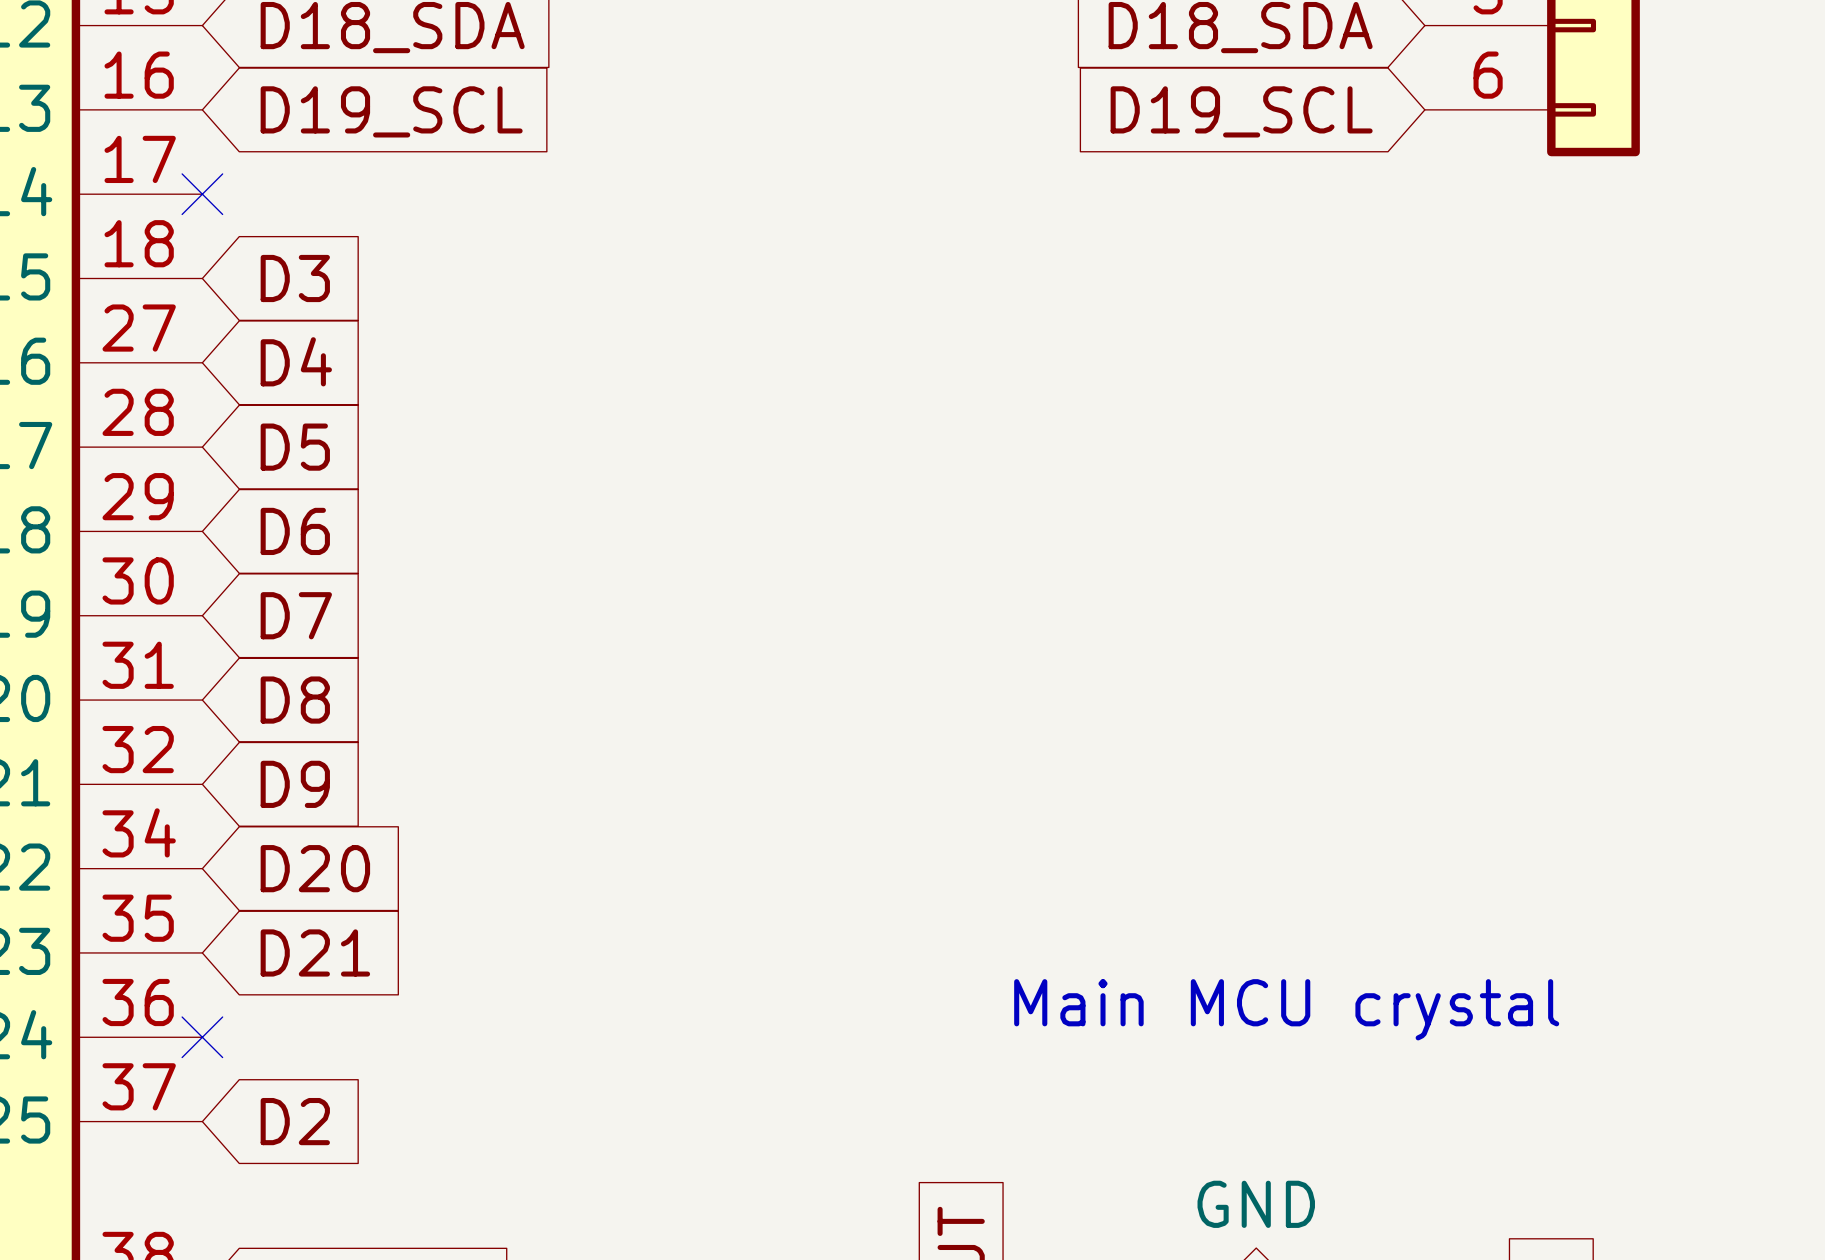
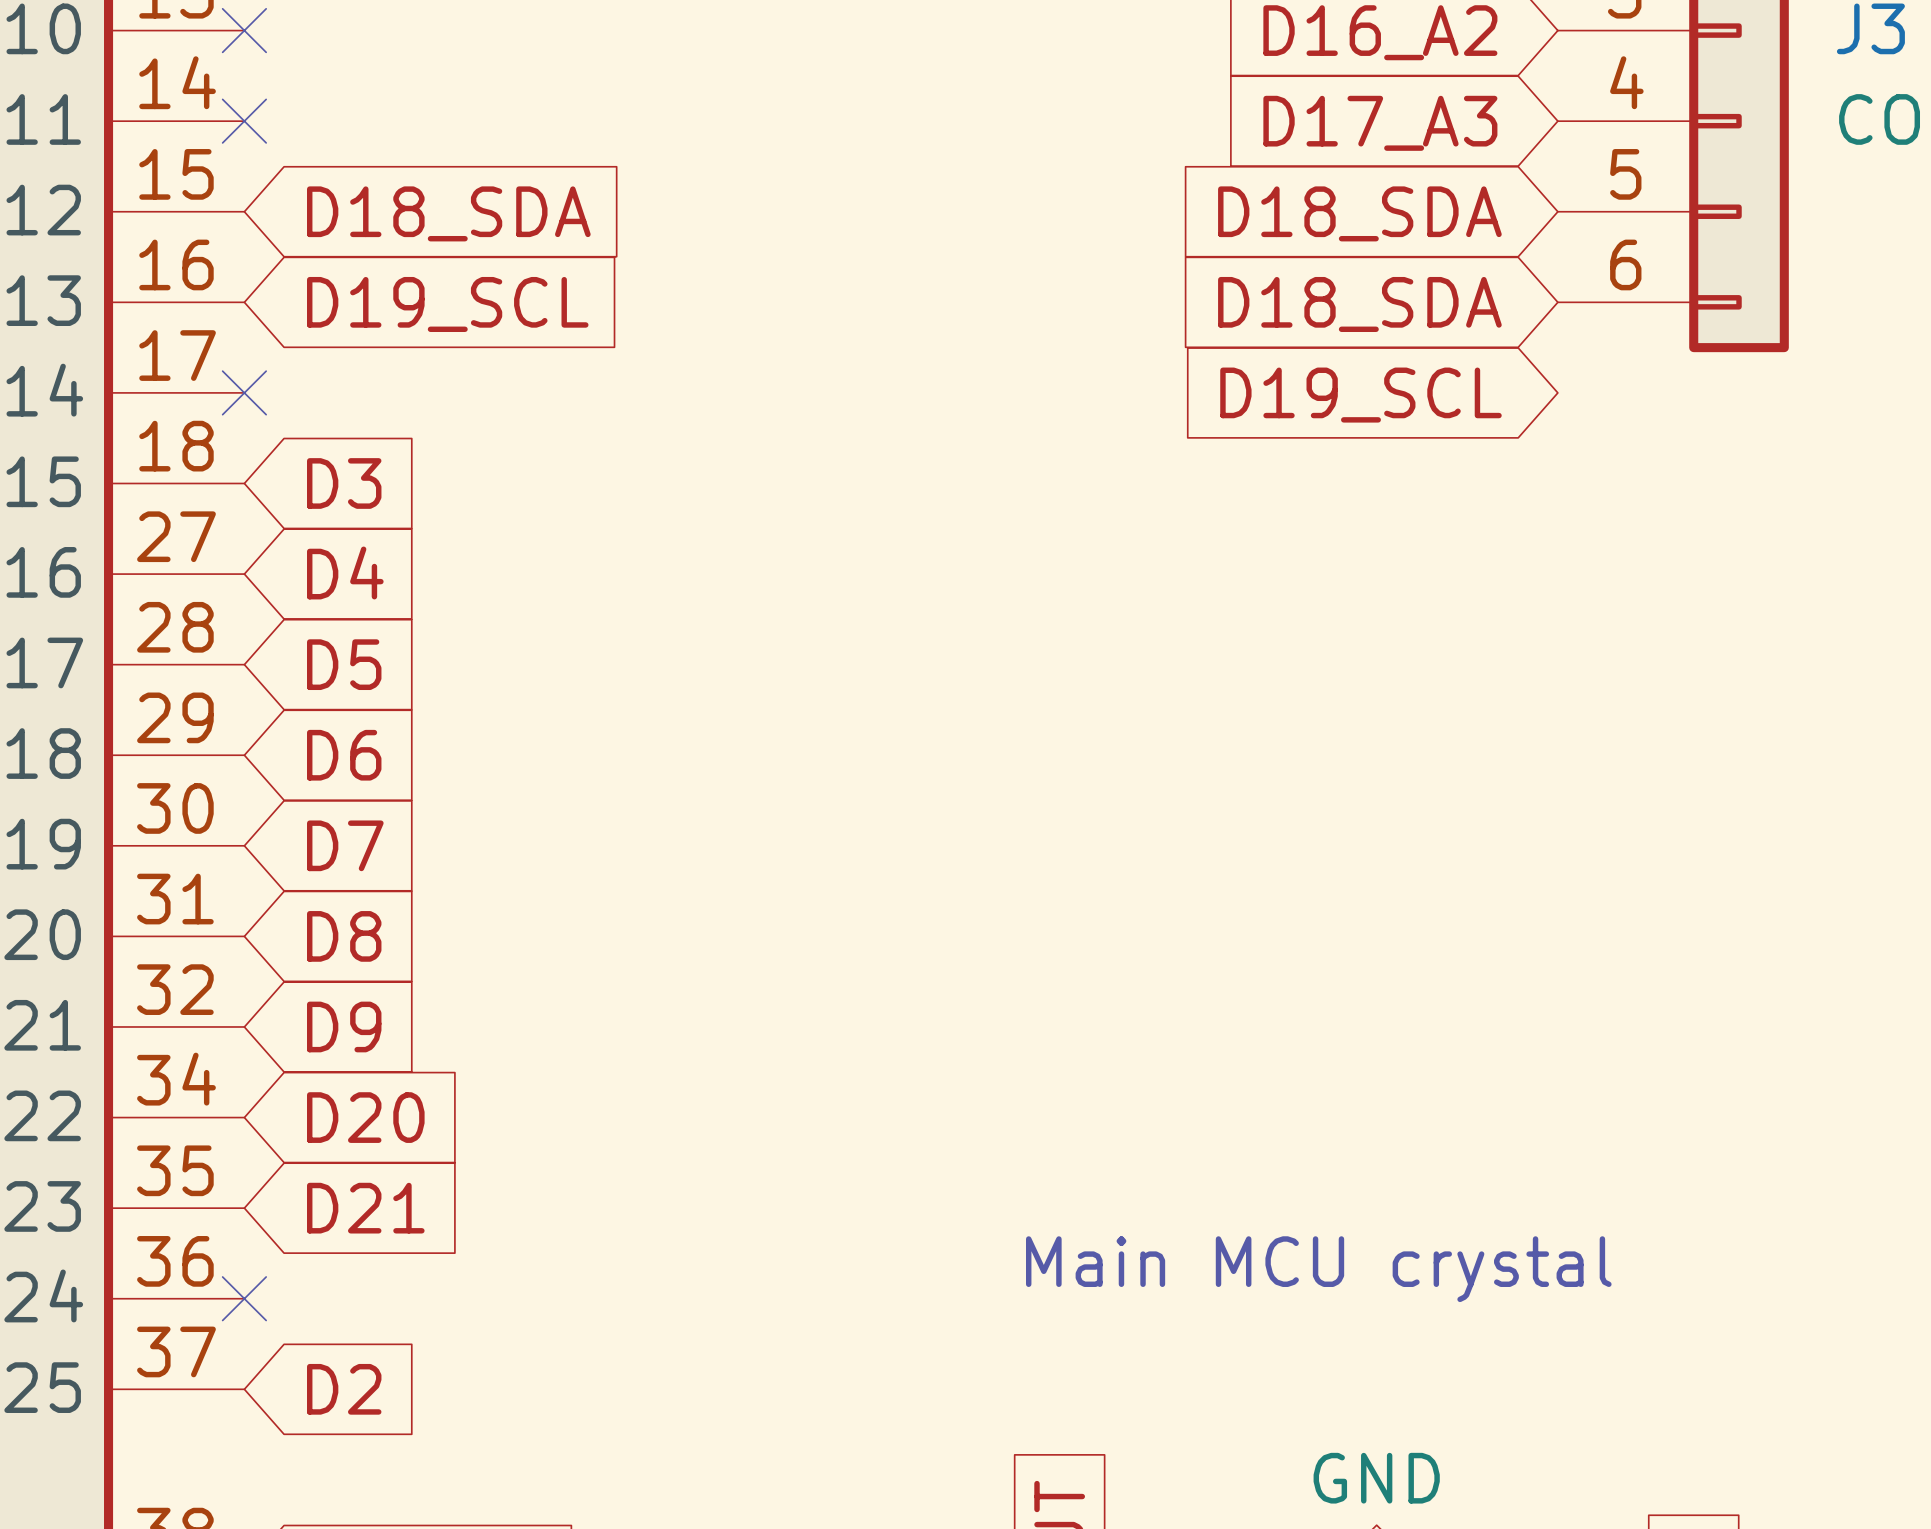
global label: D19_SCL (1241, 111) -> D18_SDA (1359, 304)
global label: none -> D19_SCL (1360, 395)
text position: Main MCU crystal (1286, 1009) -> Main MCU crystal (1318, 1269)

